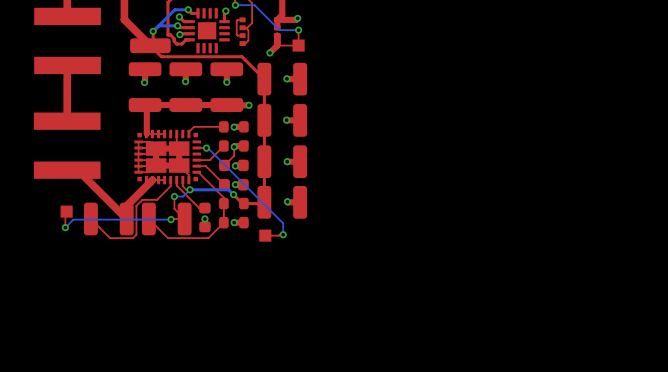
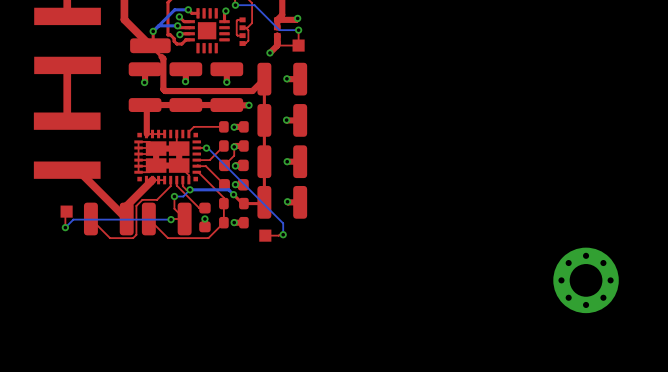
top track: (161, 56) (241, 56) (264, 79) -> (161, 56) (163, 58) (163, 89) (165, 91) (252, 91) (264, 79)
part: none -> (586, 280)

